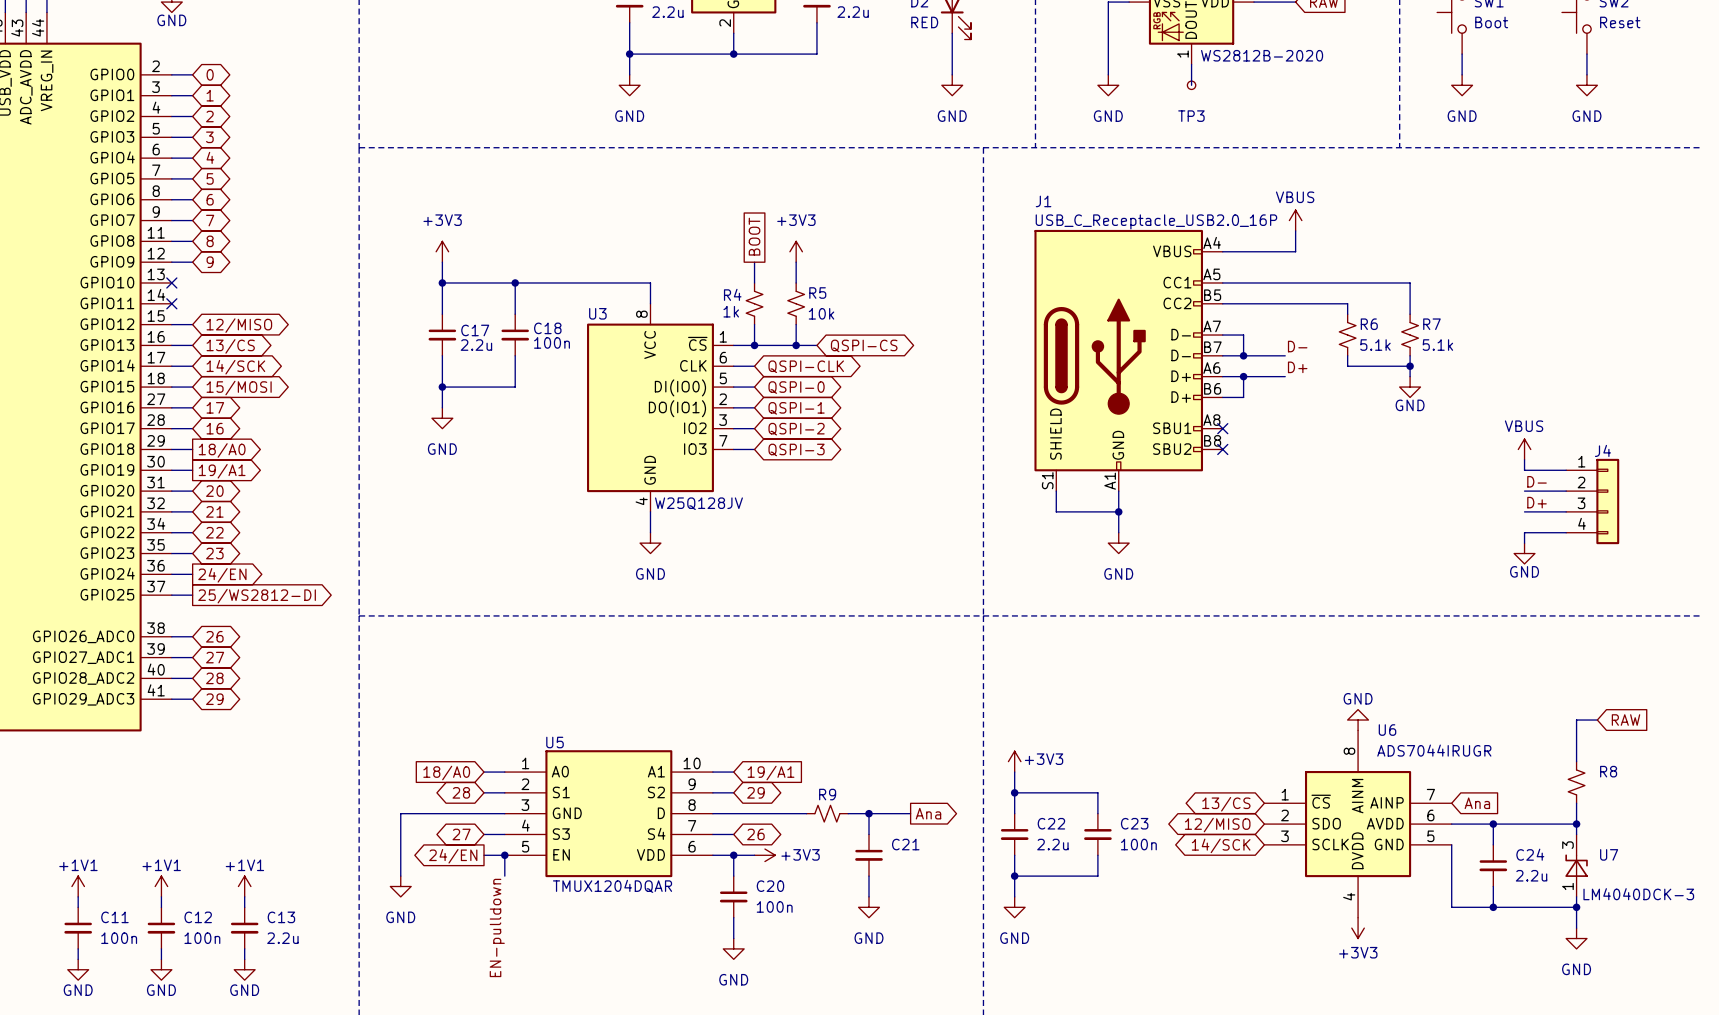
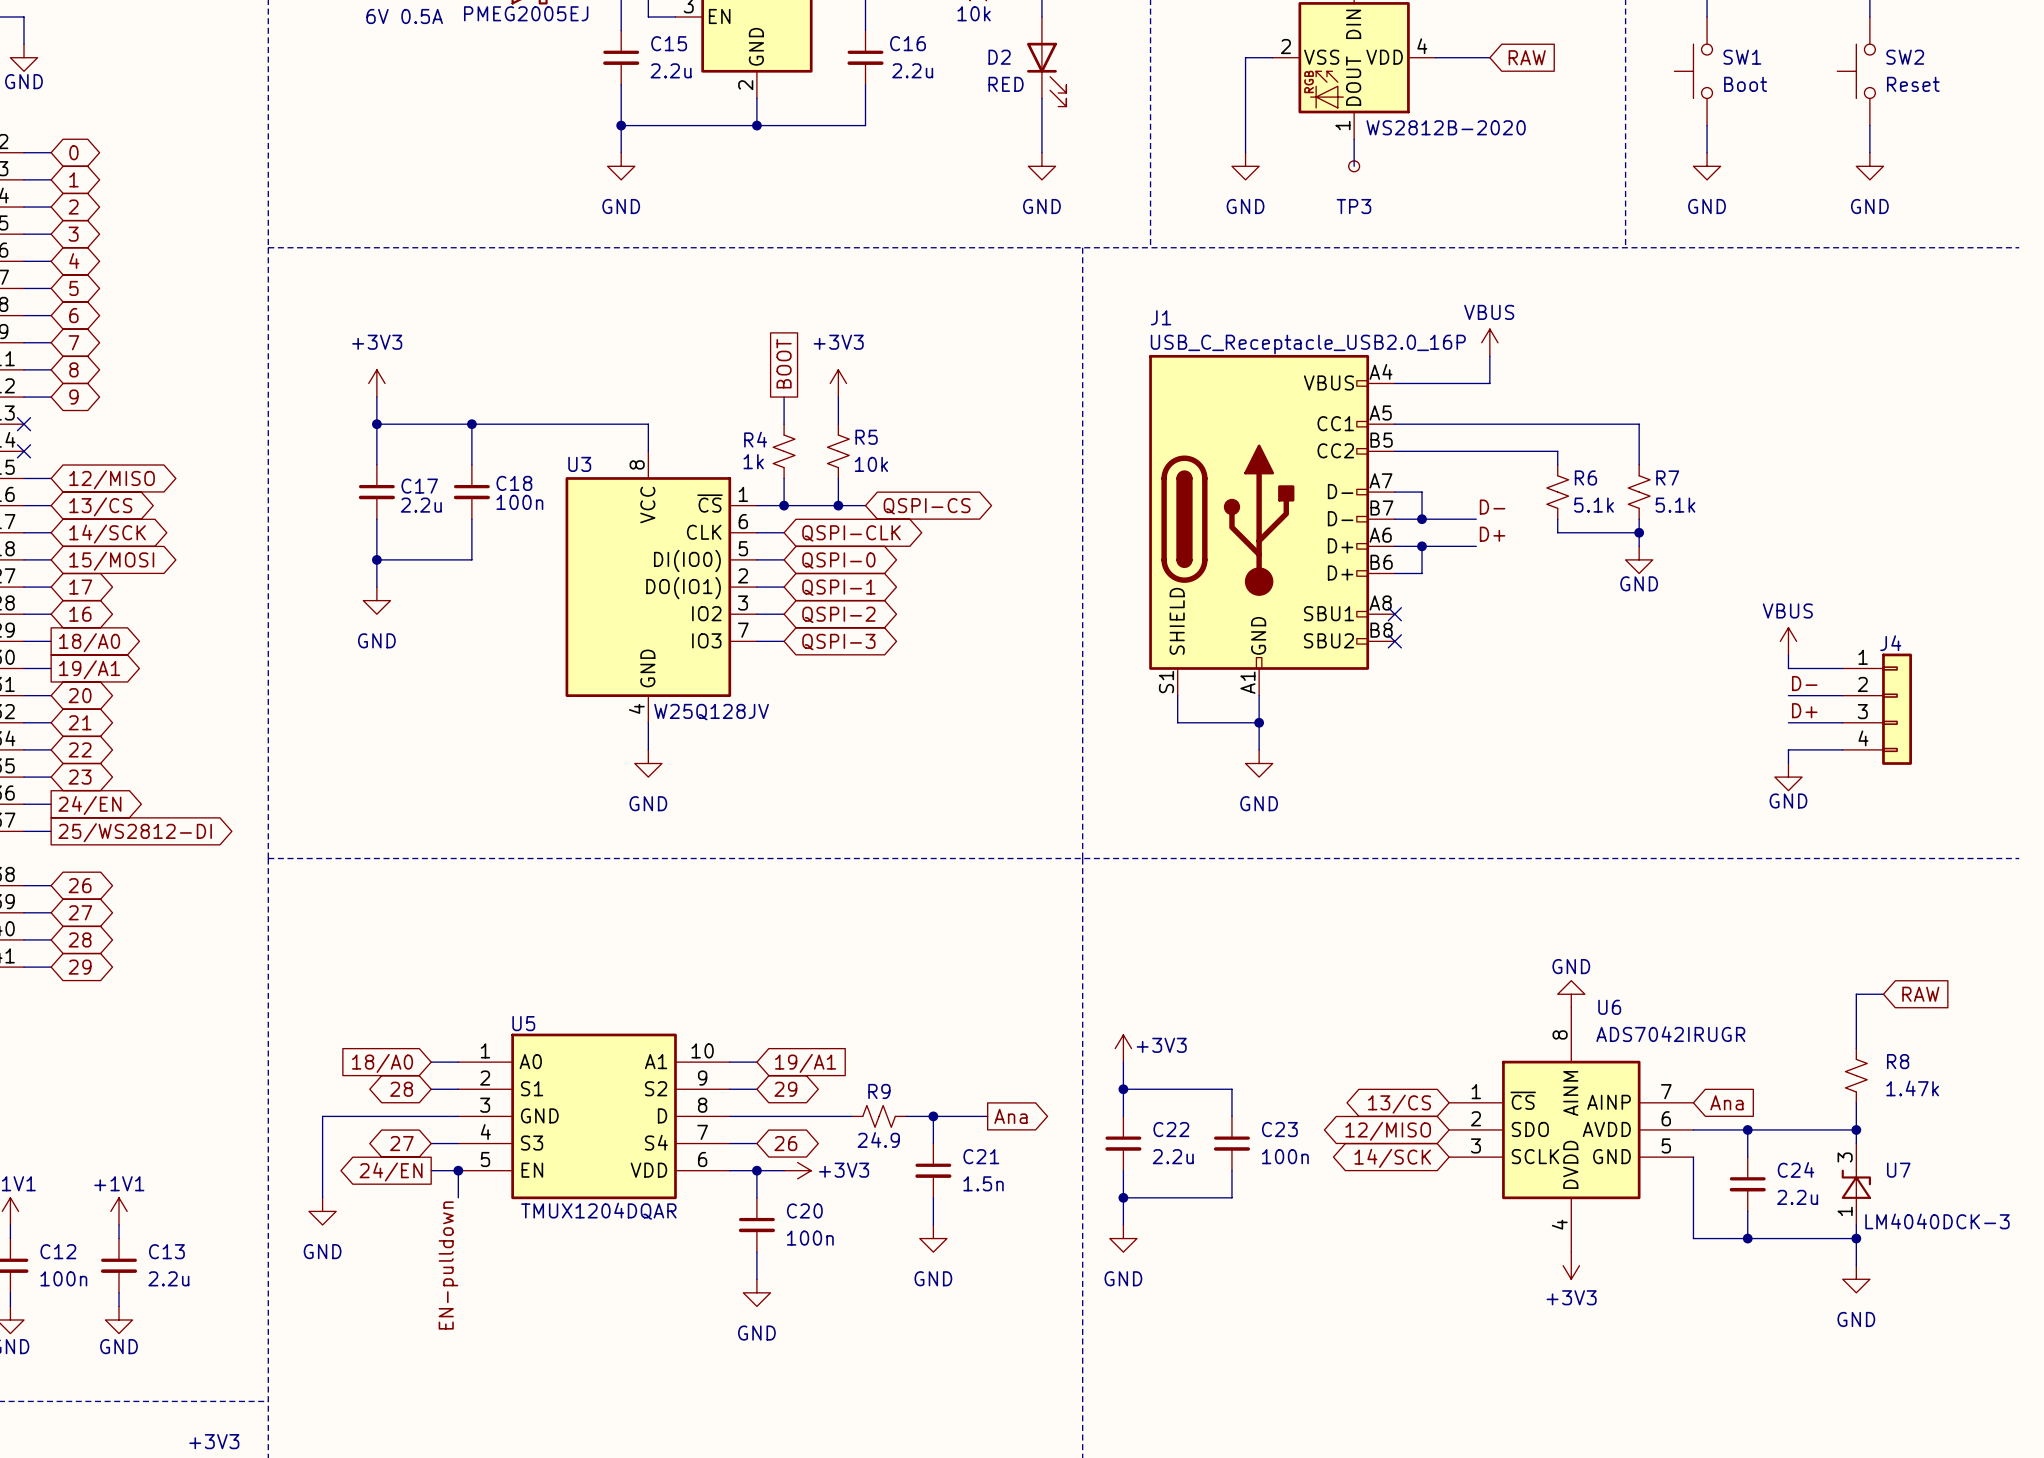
U6 value: ADS7044IRUGR (1434, 750) -> ADS7042IRUGR (1670, 1034)
R8 value: none -> 1.47k (1912, 1088)
R9 value: none -> 24.9 (878, 1140)
C21 value: none -> 1.5n (983, 1183)

